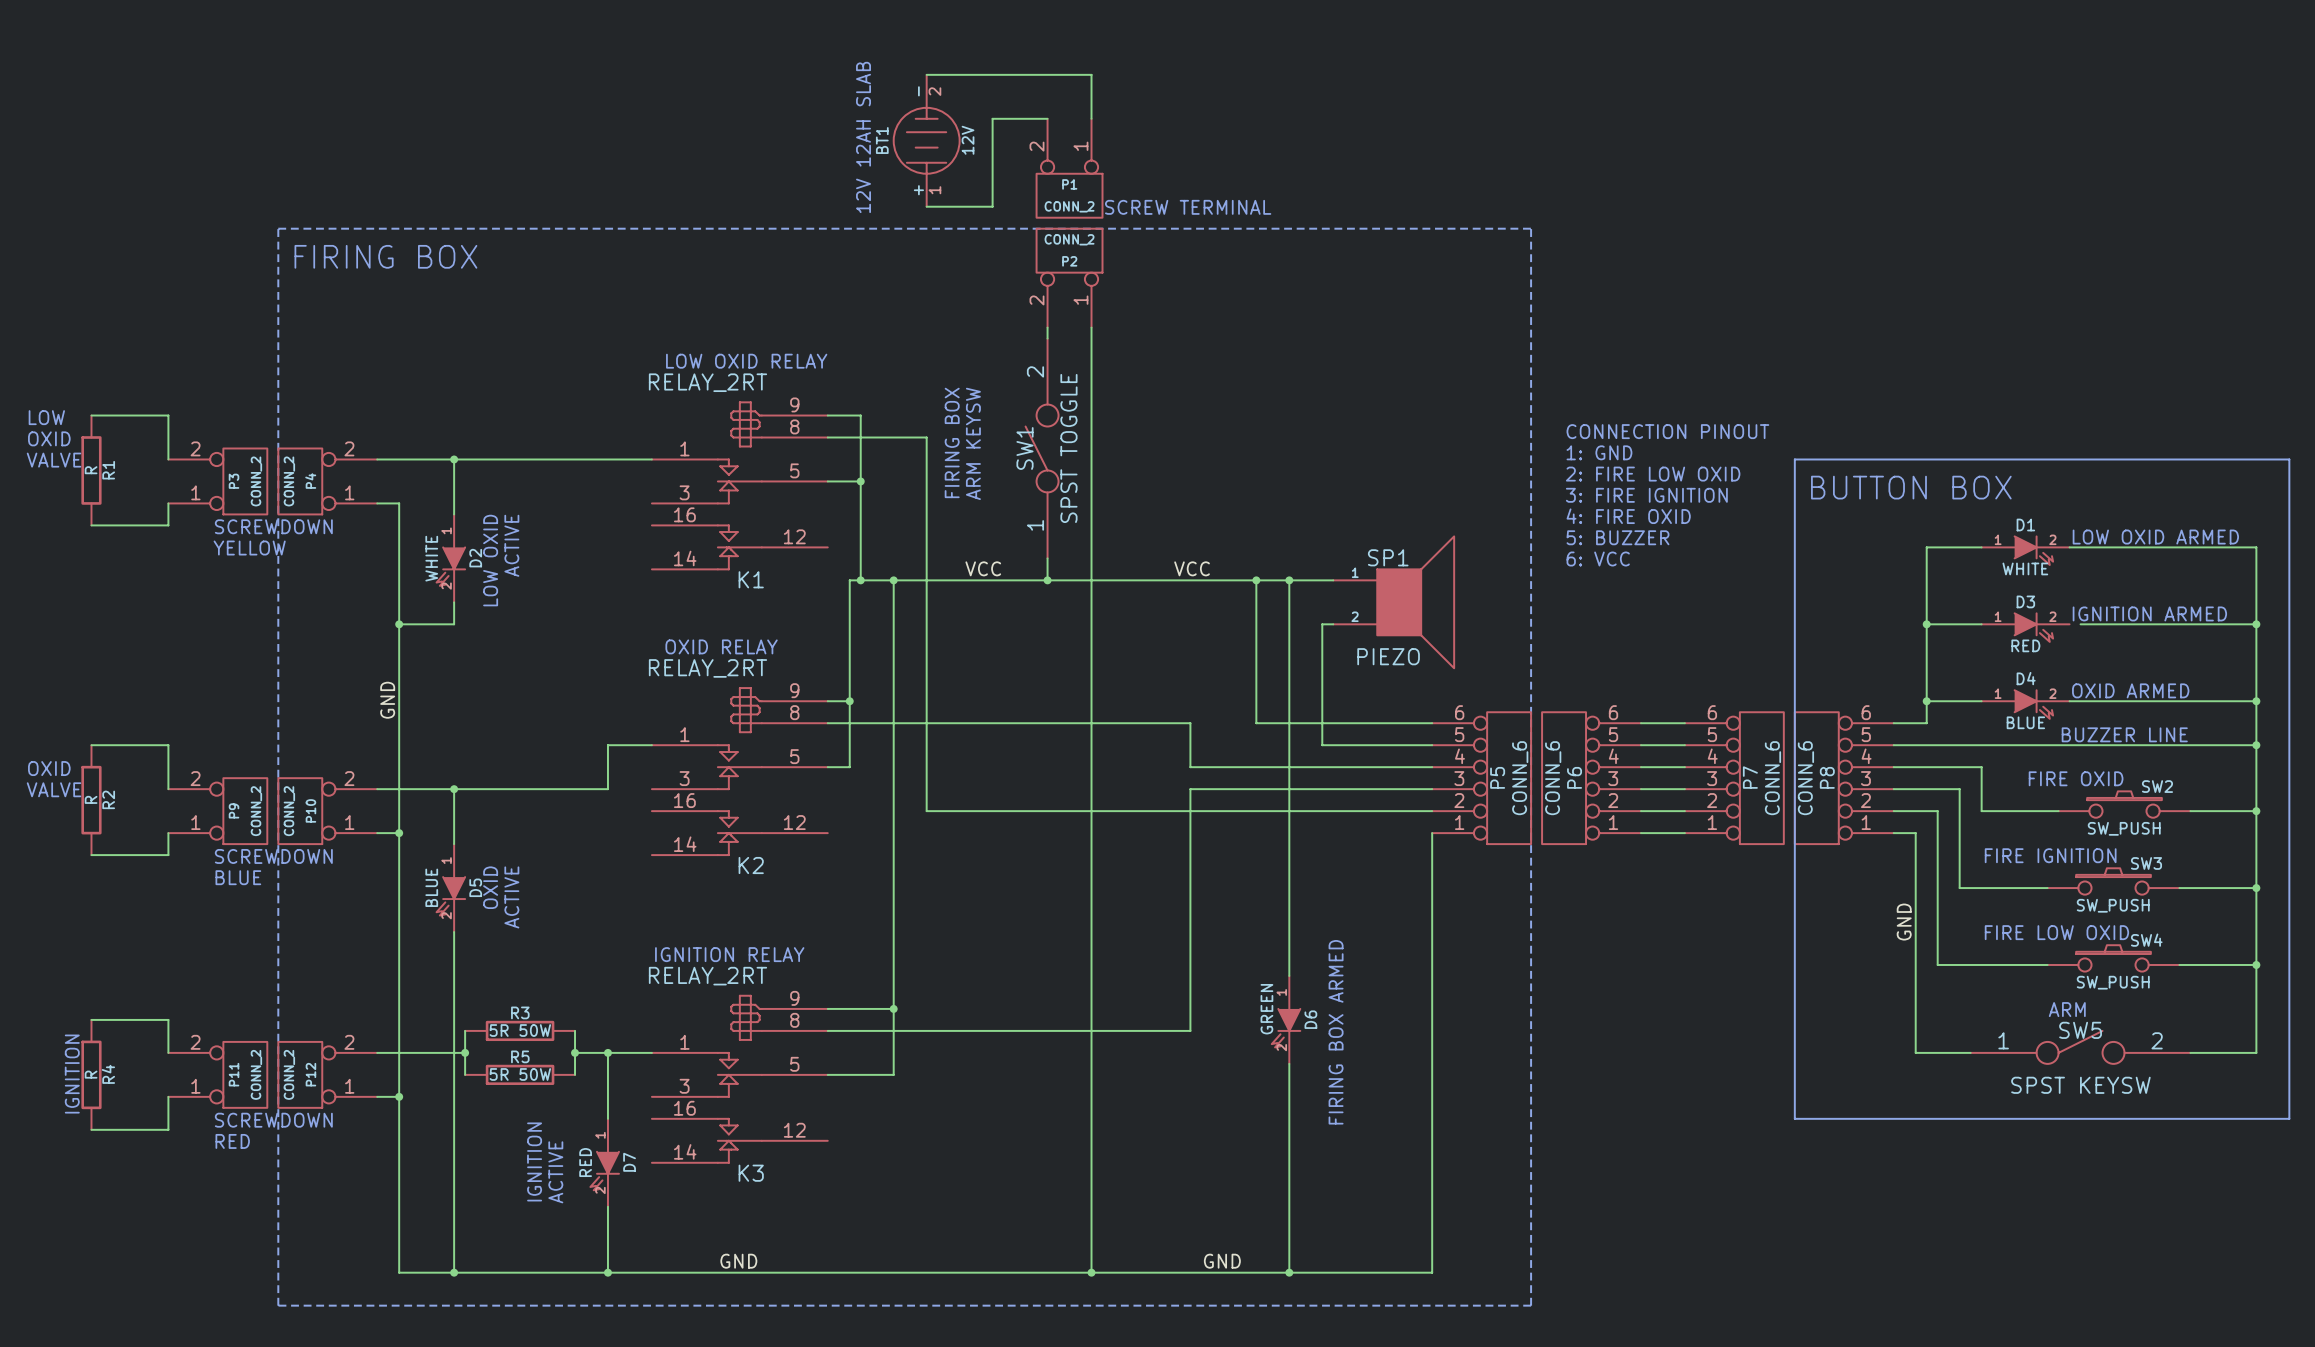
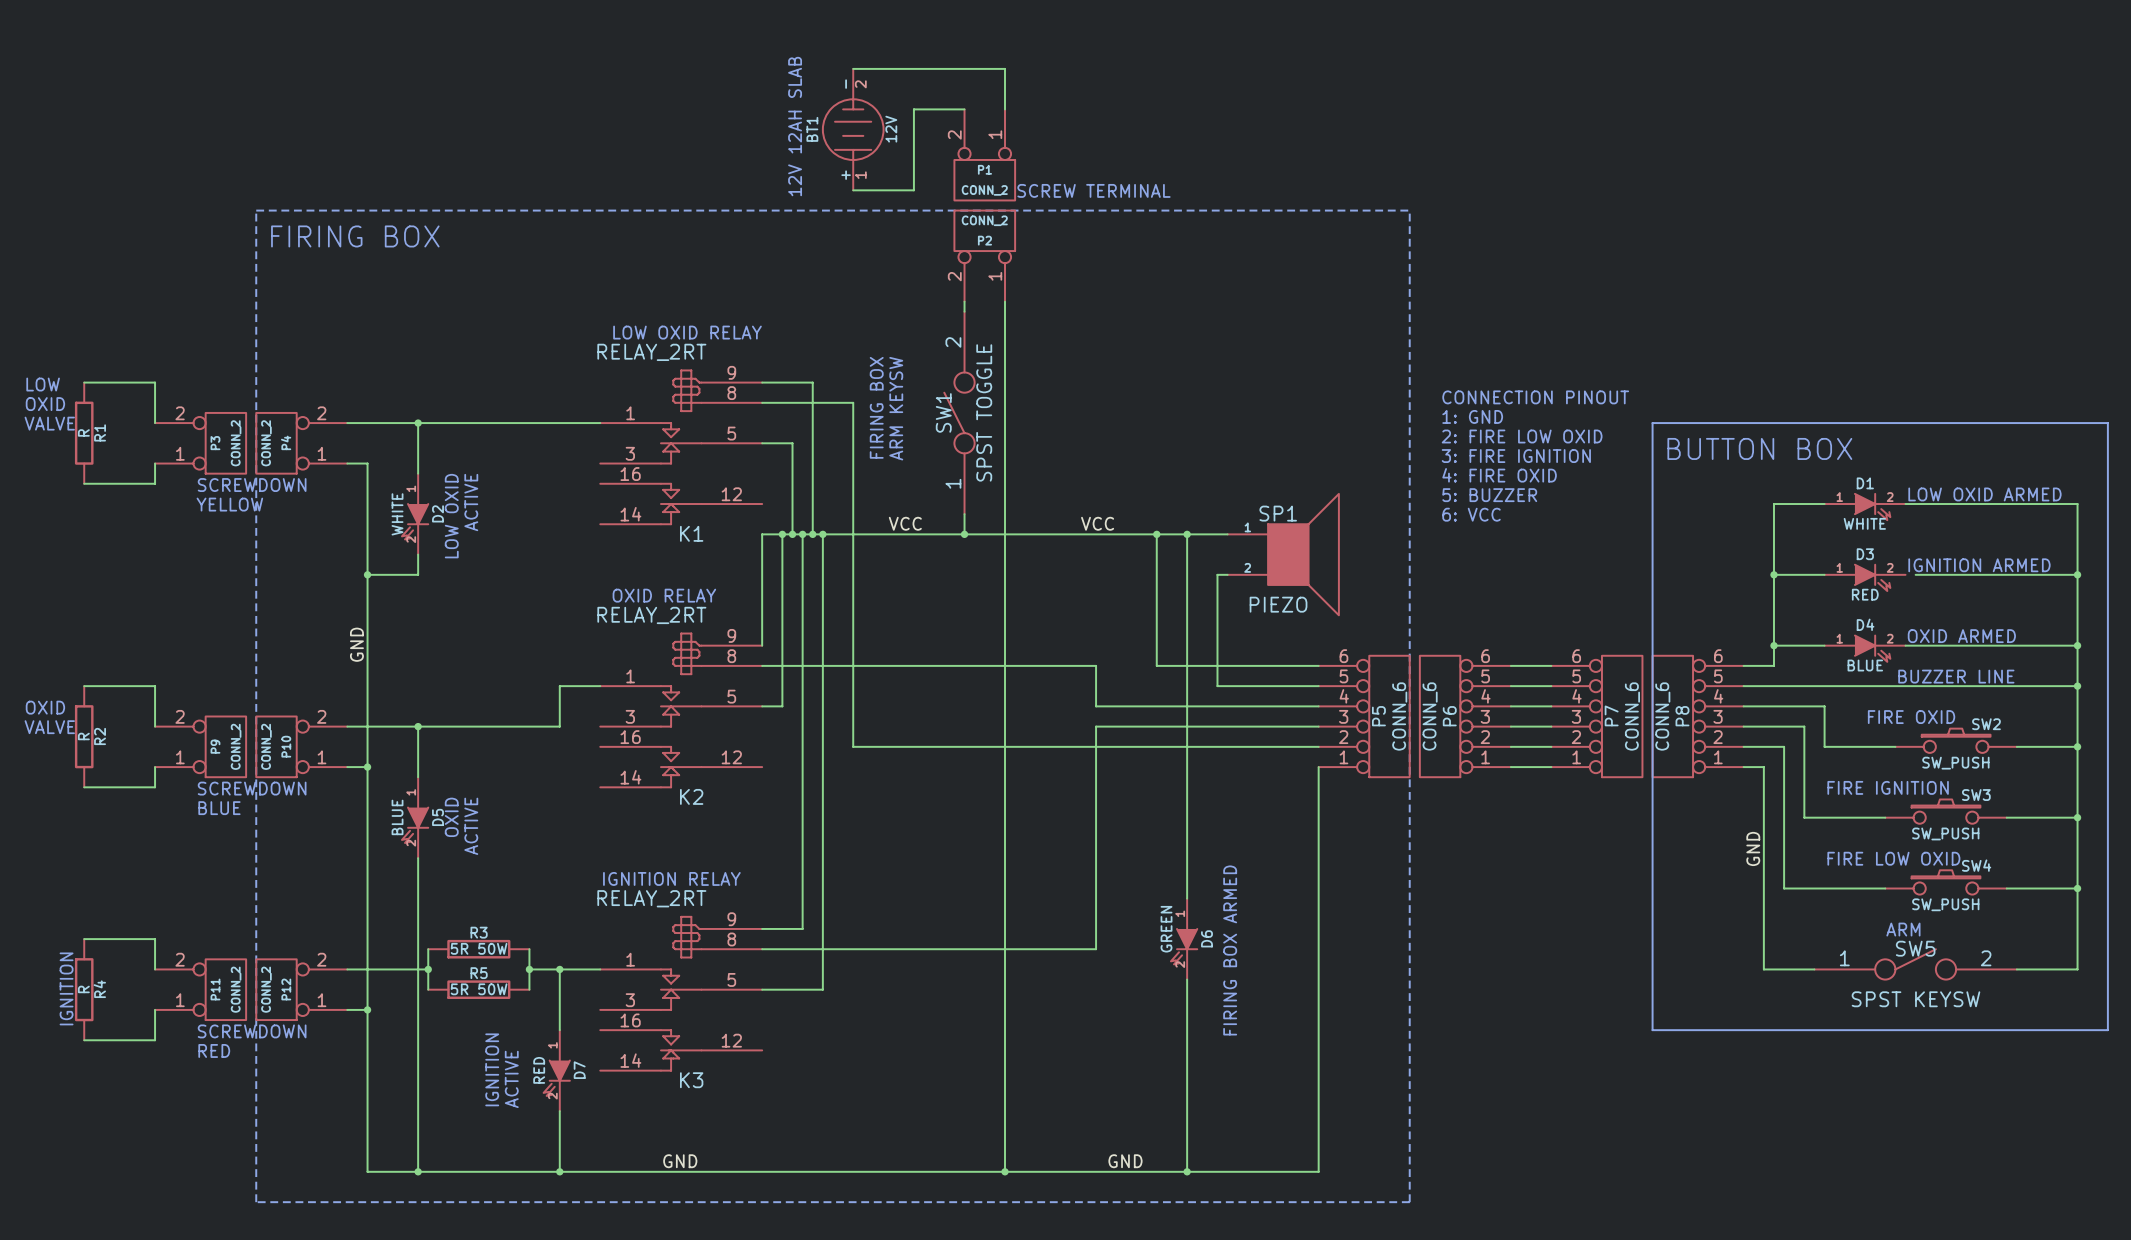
wire: (860, 415) (860, 481) -> (792, 382) (812, 382) (812, 534)
junction: (860, 481) -> none
junction: none -> (782, 534)
junction: none -> (802, 534)
junction: none -> (812, 534)
wire: (827, 701) (849, 701) -> (762, 645) (762, 534) (782, 534)
junction: (849, 701) -> none
wire: (871, 1008) (893, 1008) -> (802, 928) (802, 534)
junction: (893, 1008) -> none

